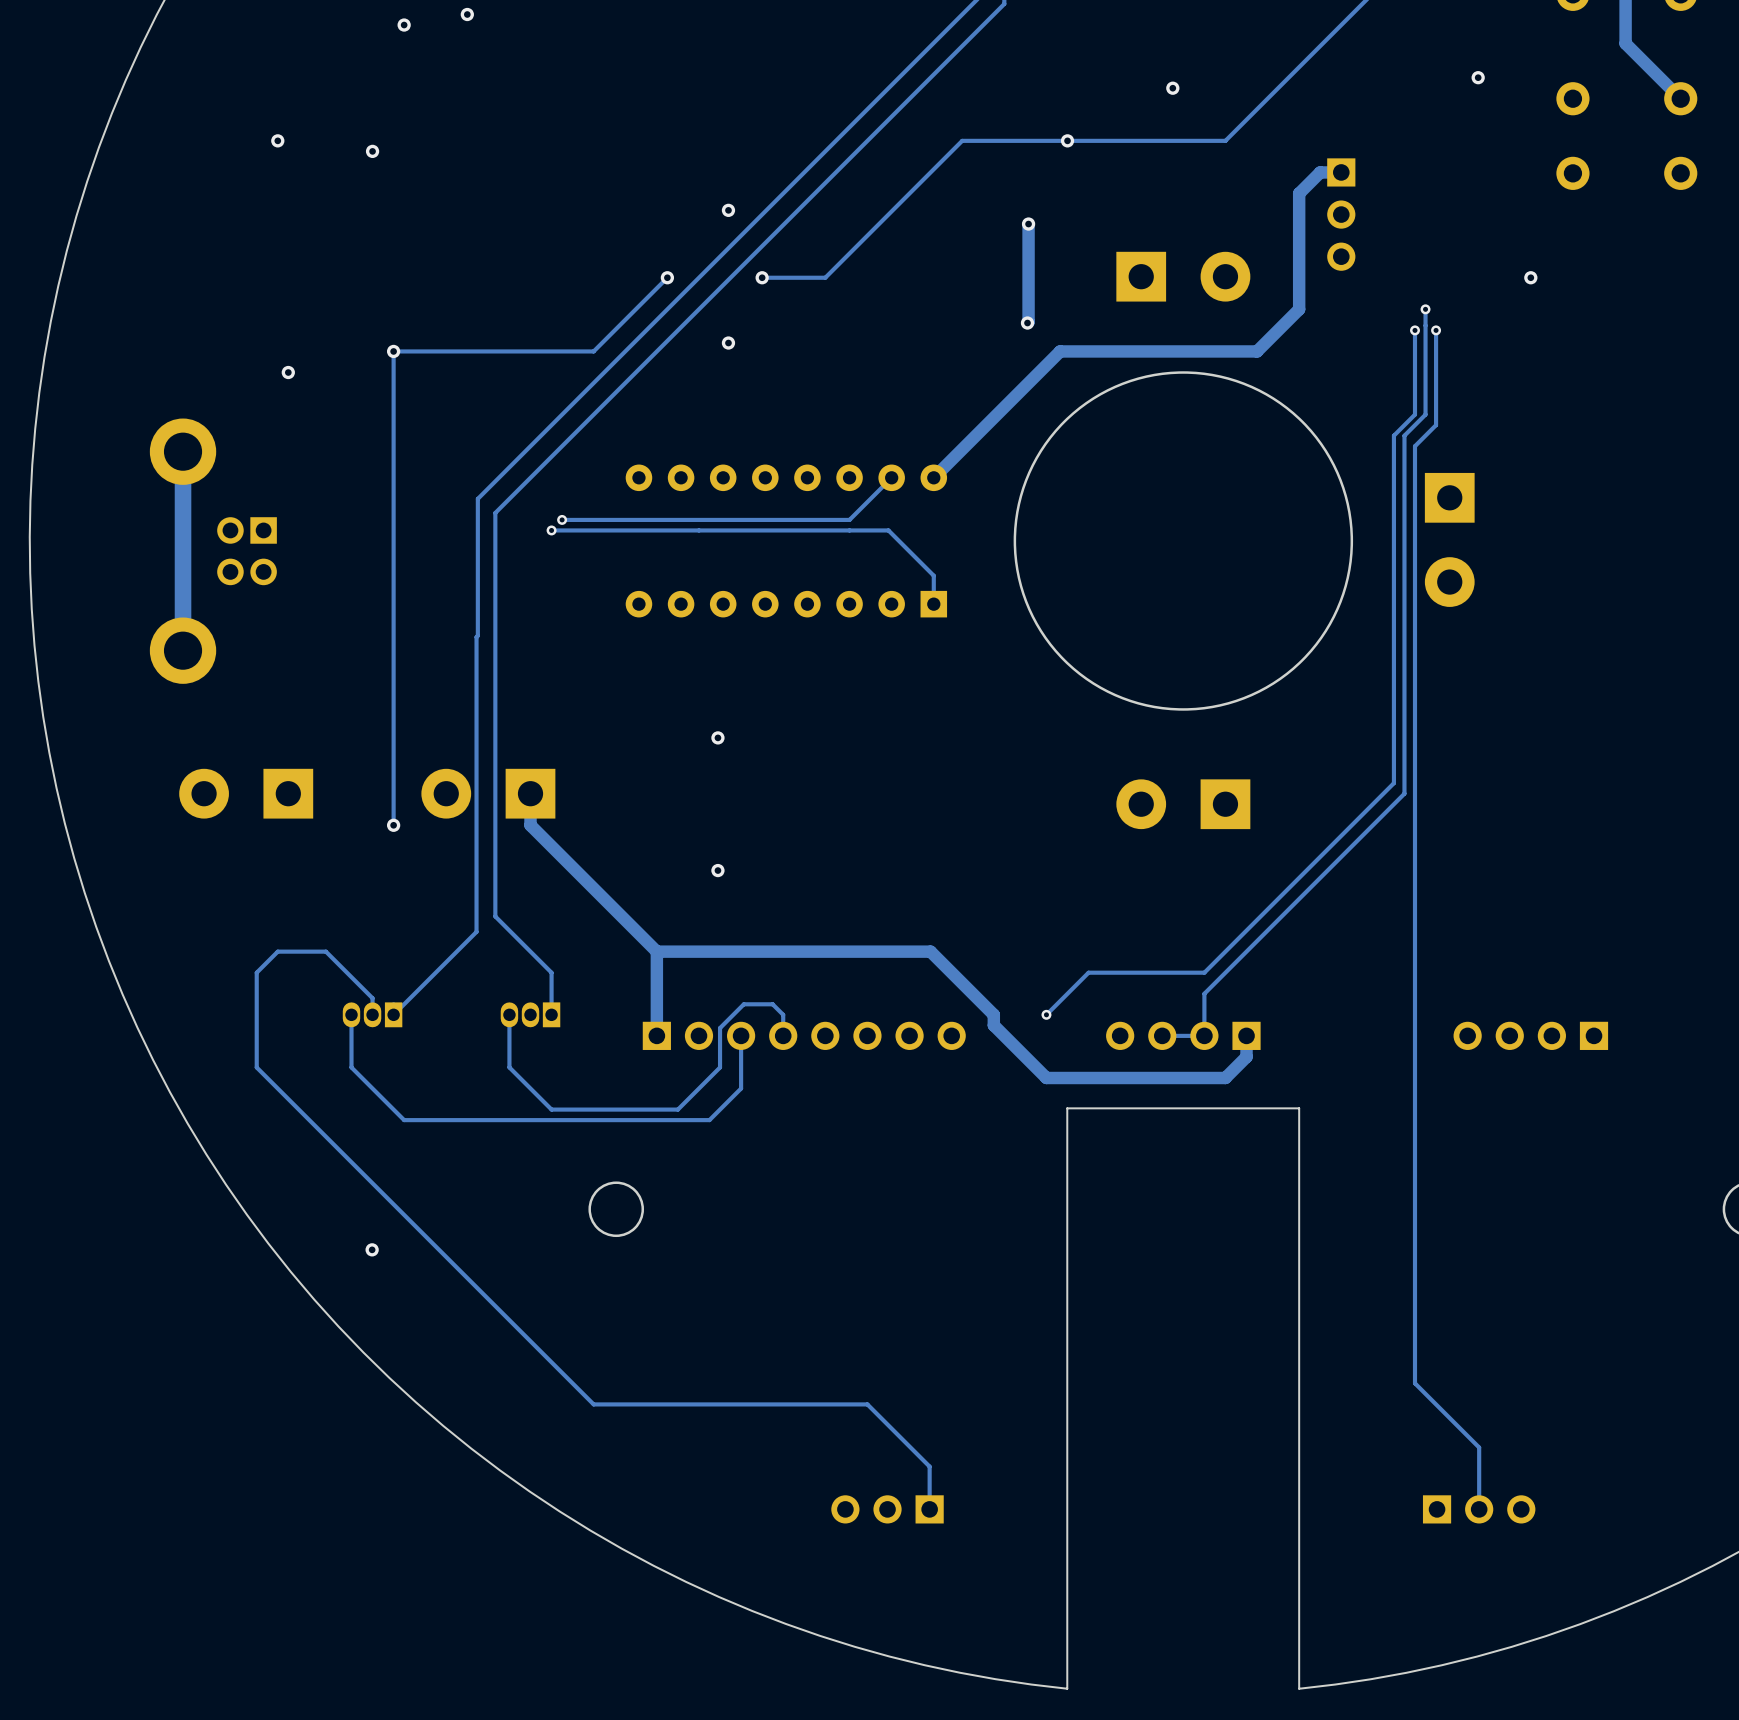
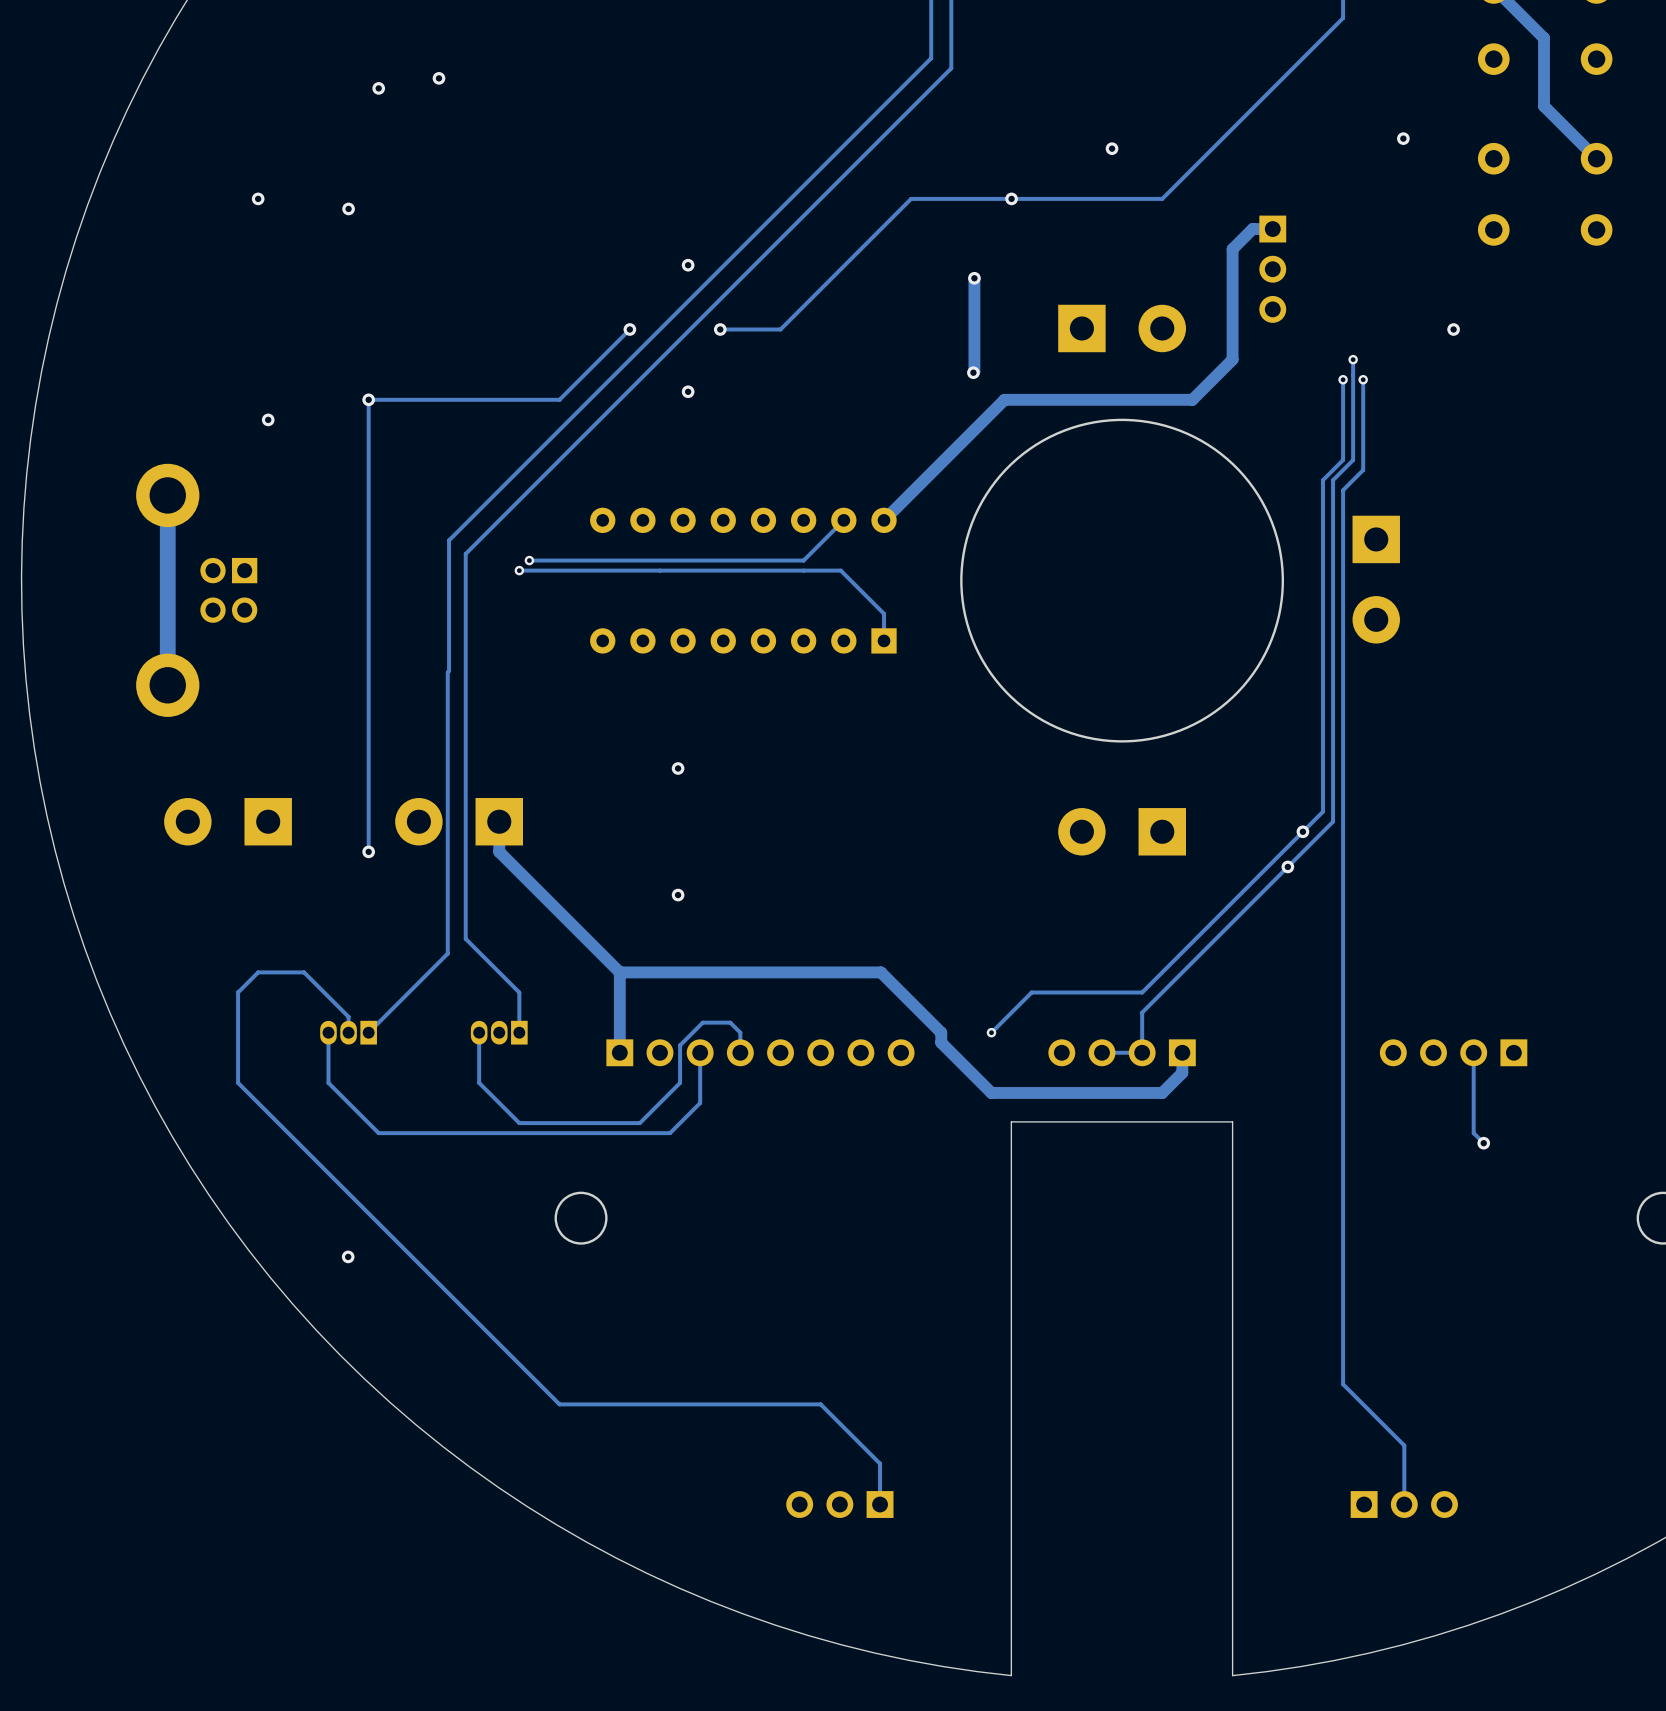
via: none -> (1302, 831)
via: none -> (1287, 866)
track: none -> (1473, 1052) (1473, 1133) (1483, 1143)
via: none -> (1483, 1143)

